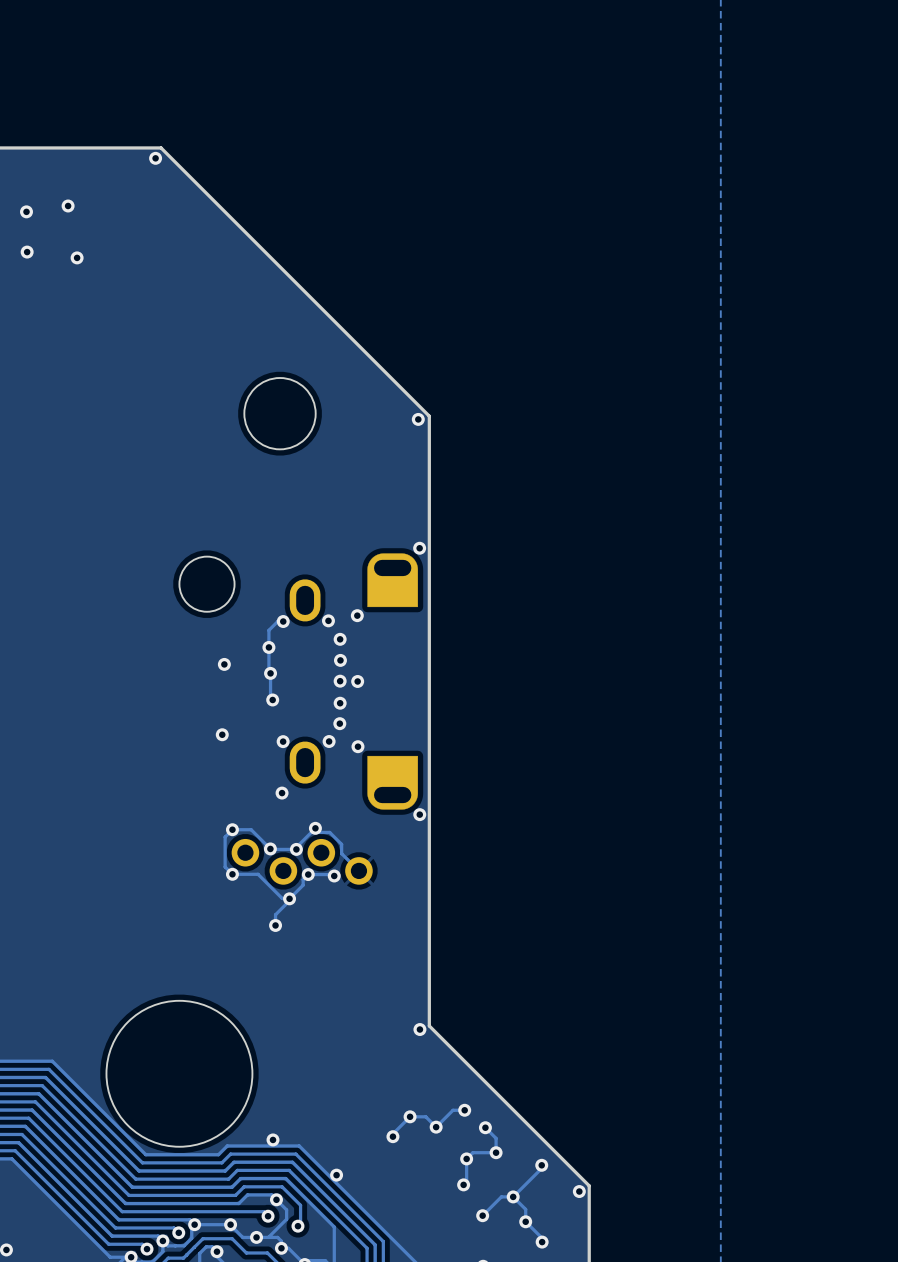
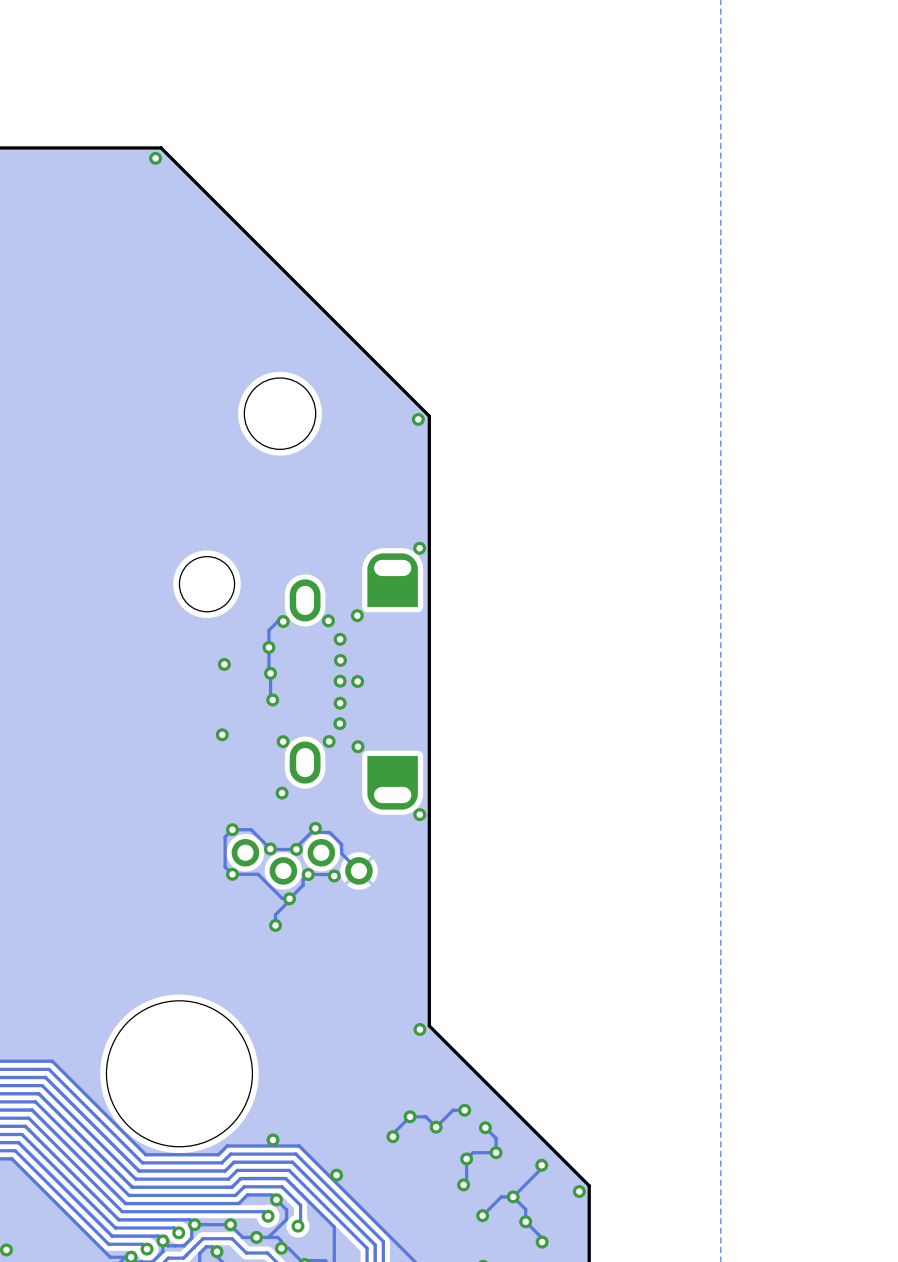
via: (68, 205) -> none
via: (26, 211) -> none
via: (27, 252) -> none
via: (77, 257) -> none

